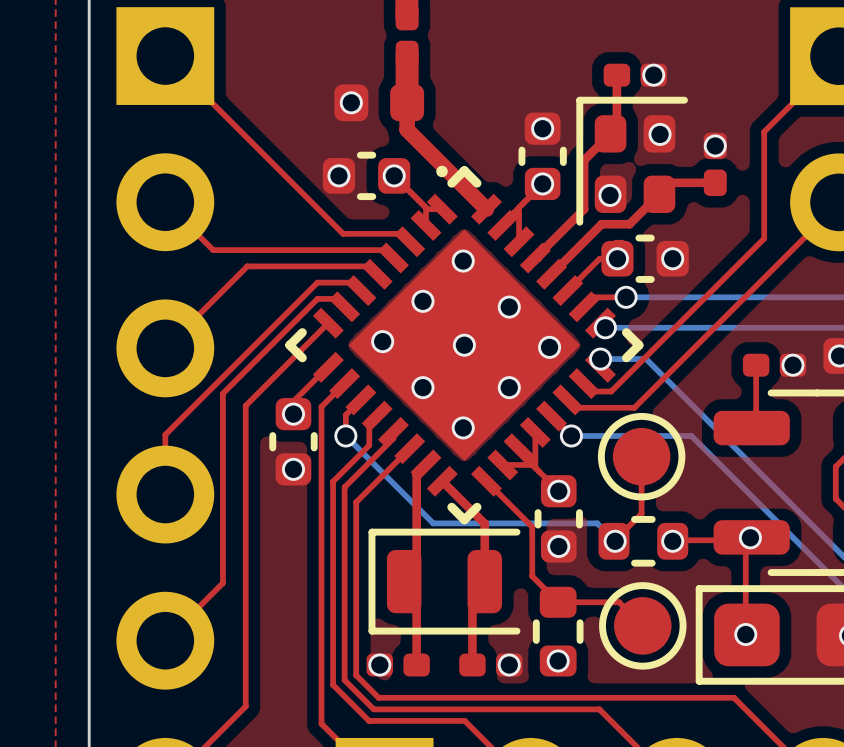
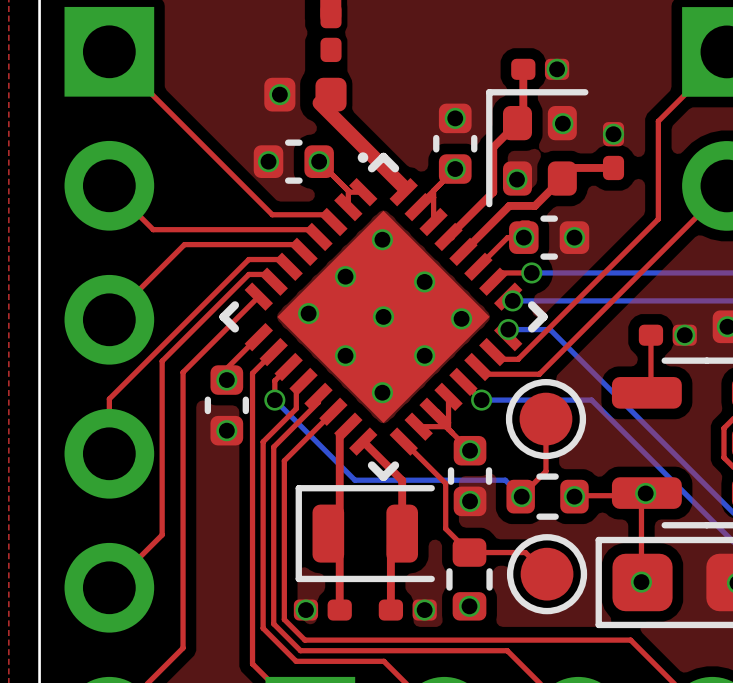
top track: (407, 54) (407, 129) (486, 209) -> (319, 103) (403, 187) (403, 192)

